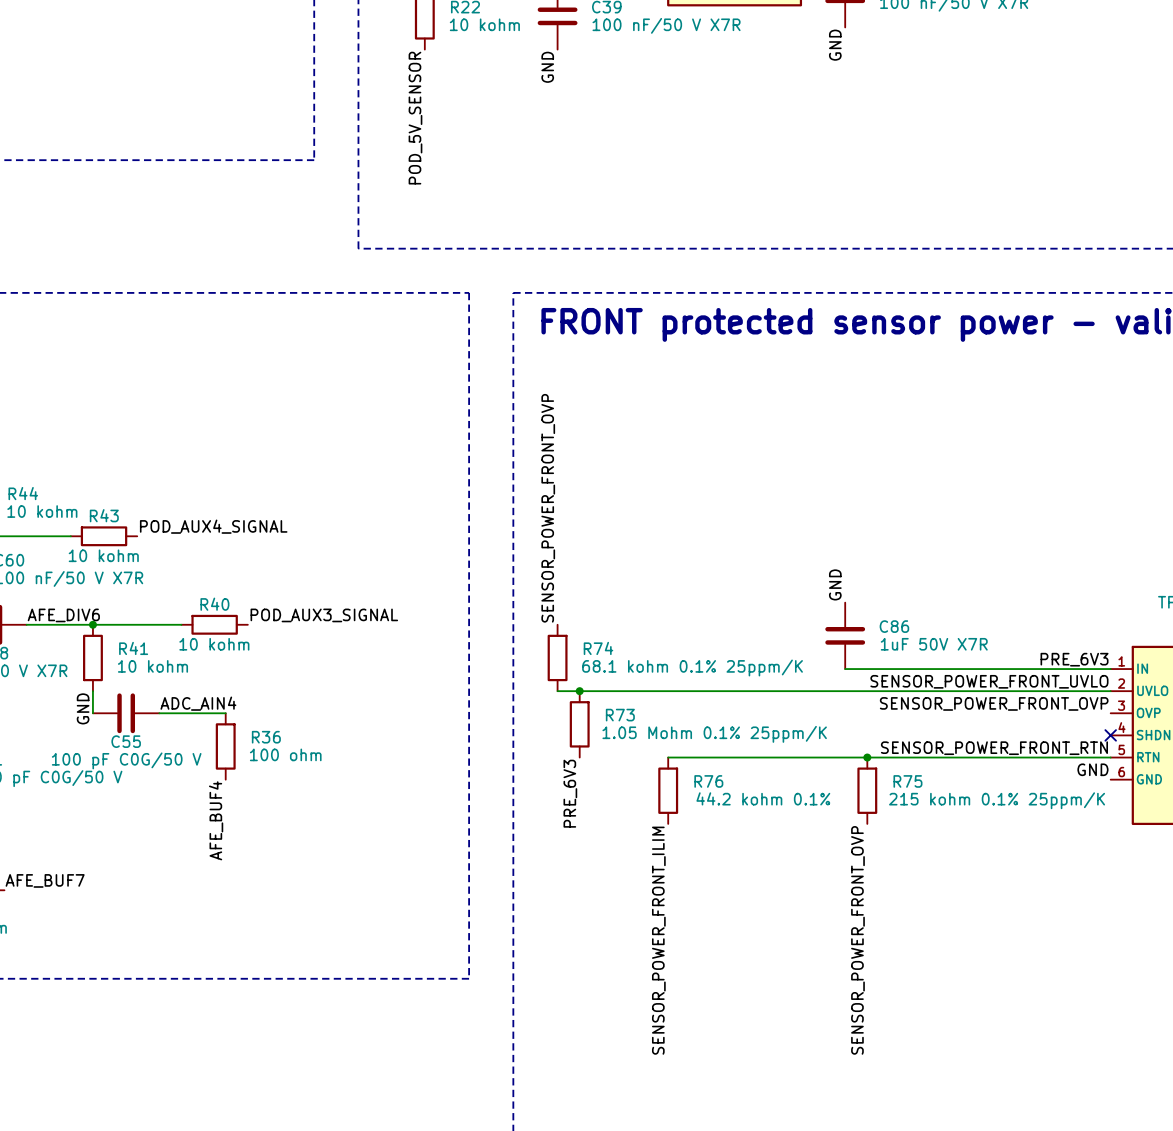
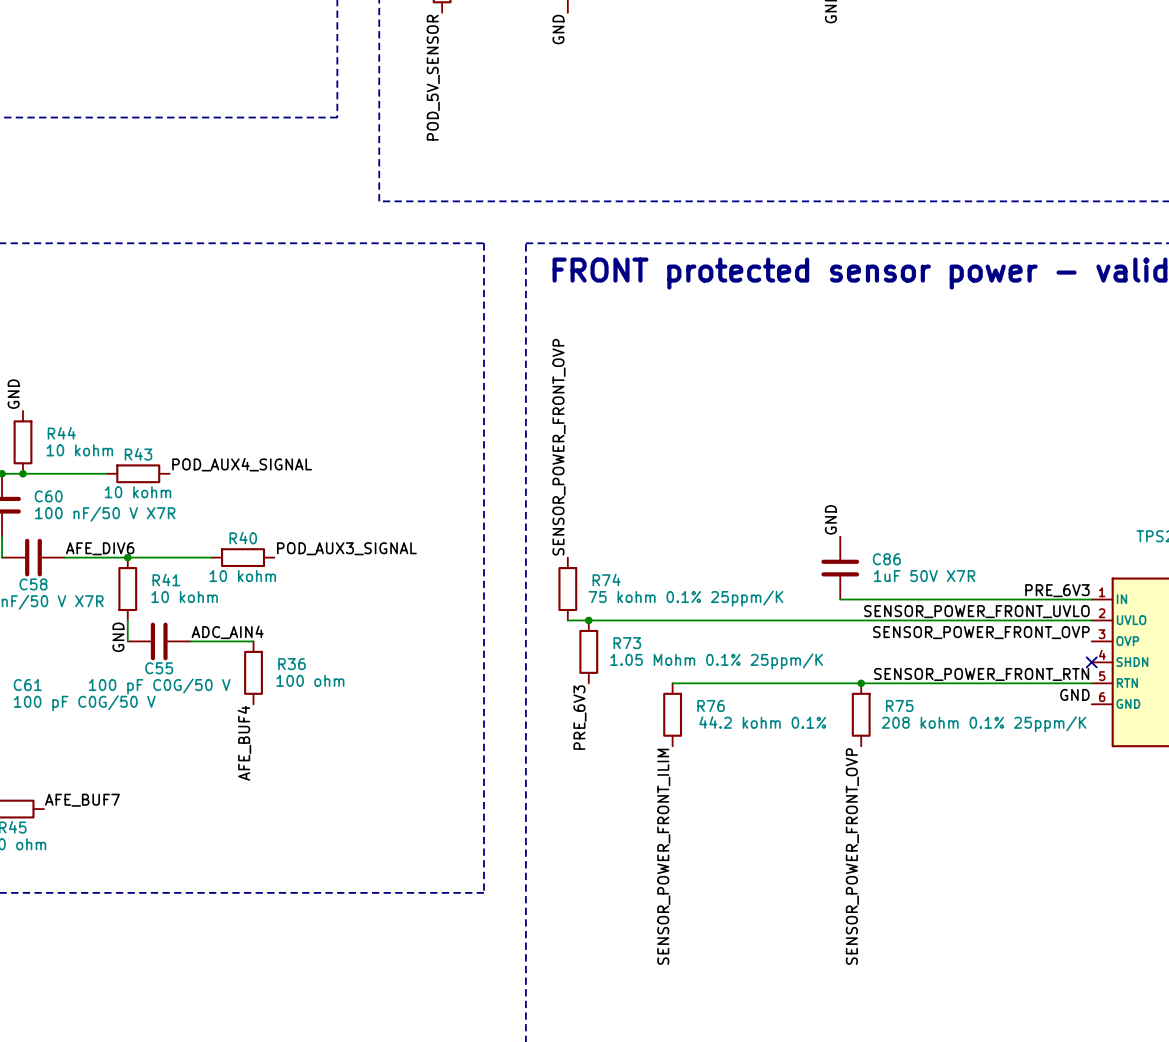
R74 value: 68.1 kohm 0.1% 25ppm/K (692, 667) -> 75 kohm 0.1% 25ppm/K (685, 598)
R75 value: 215 kohm 0.1% 25ppm/K (997, 800) -> 208 kohm 0.1% 25ppm/K (984, 724)

